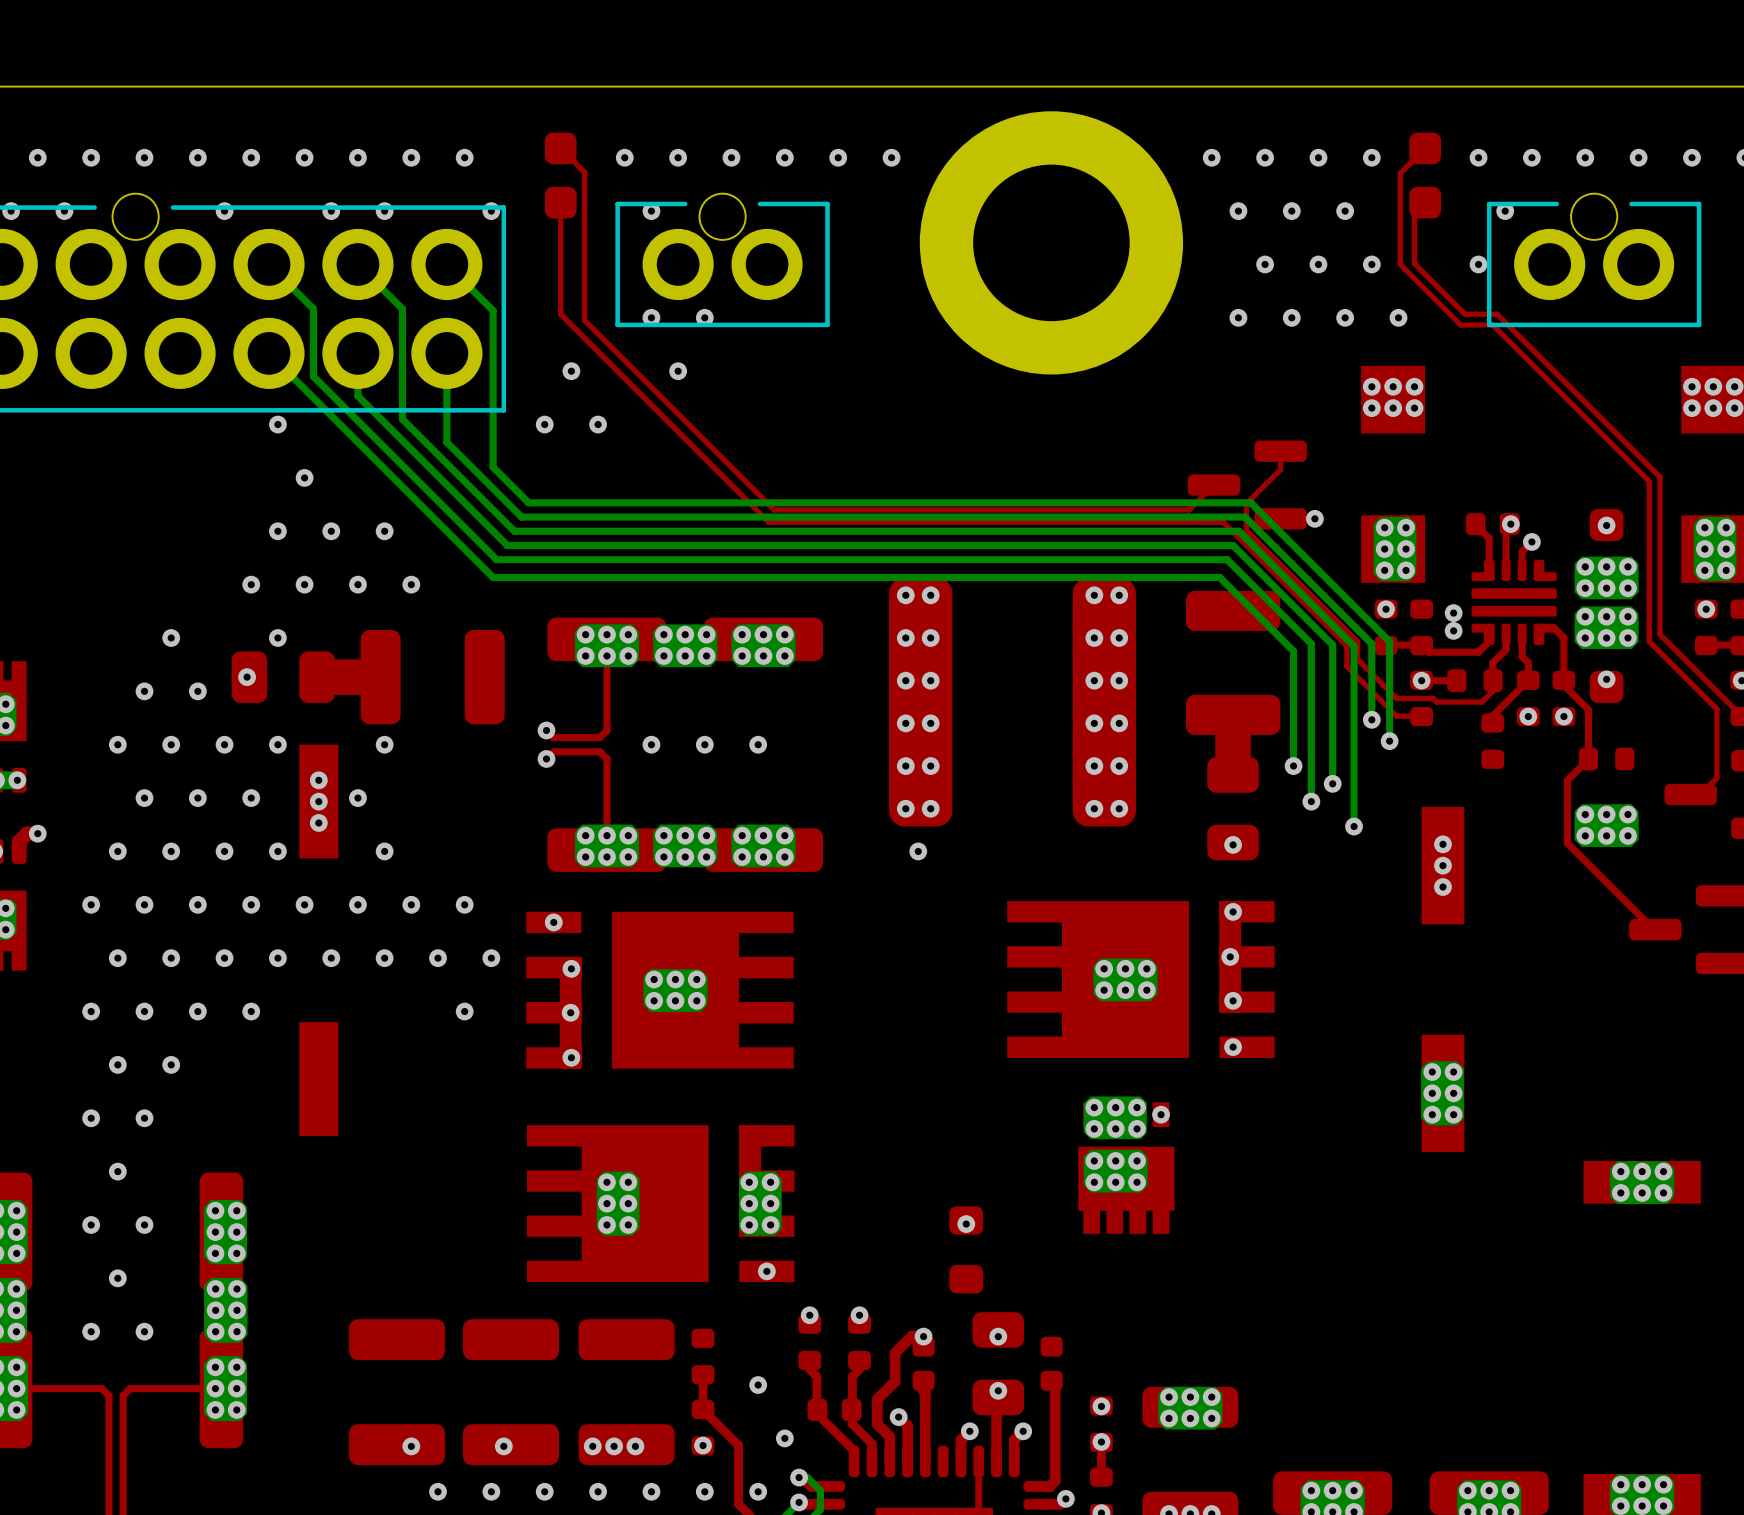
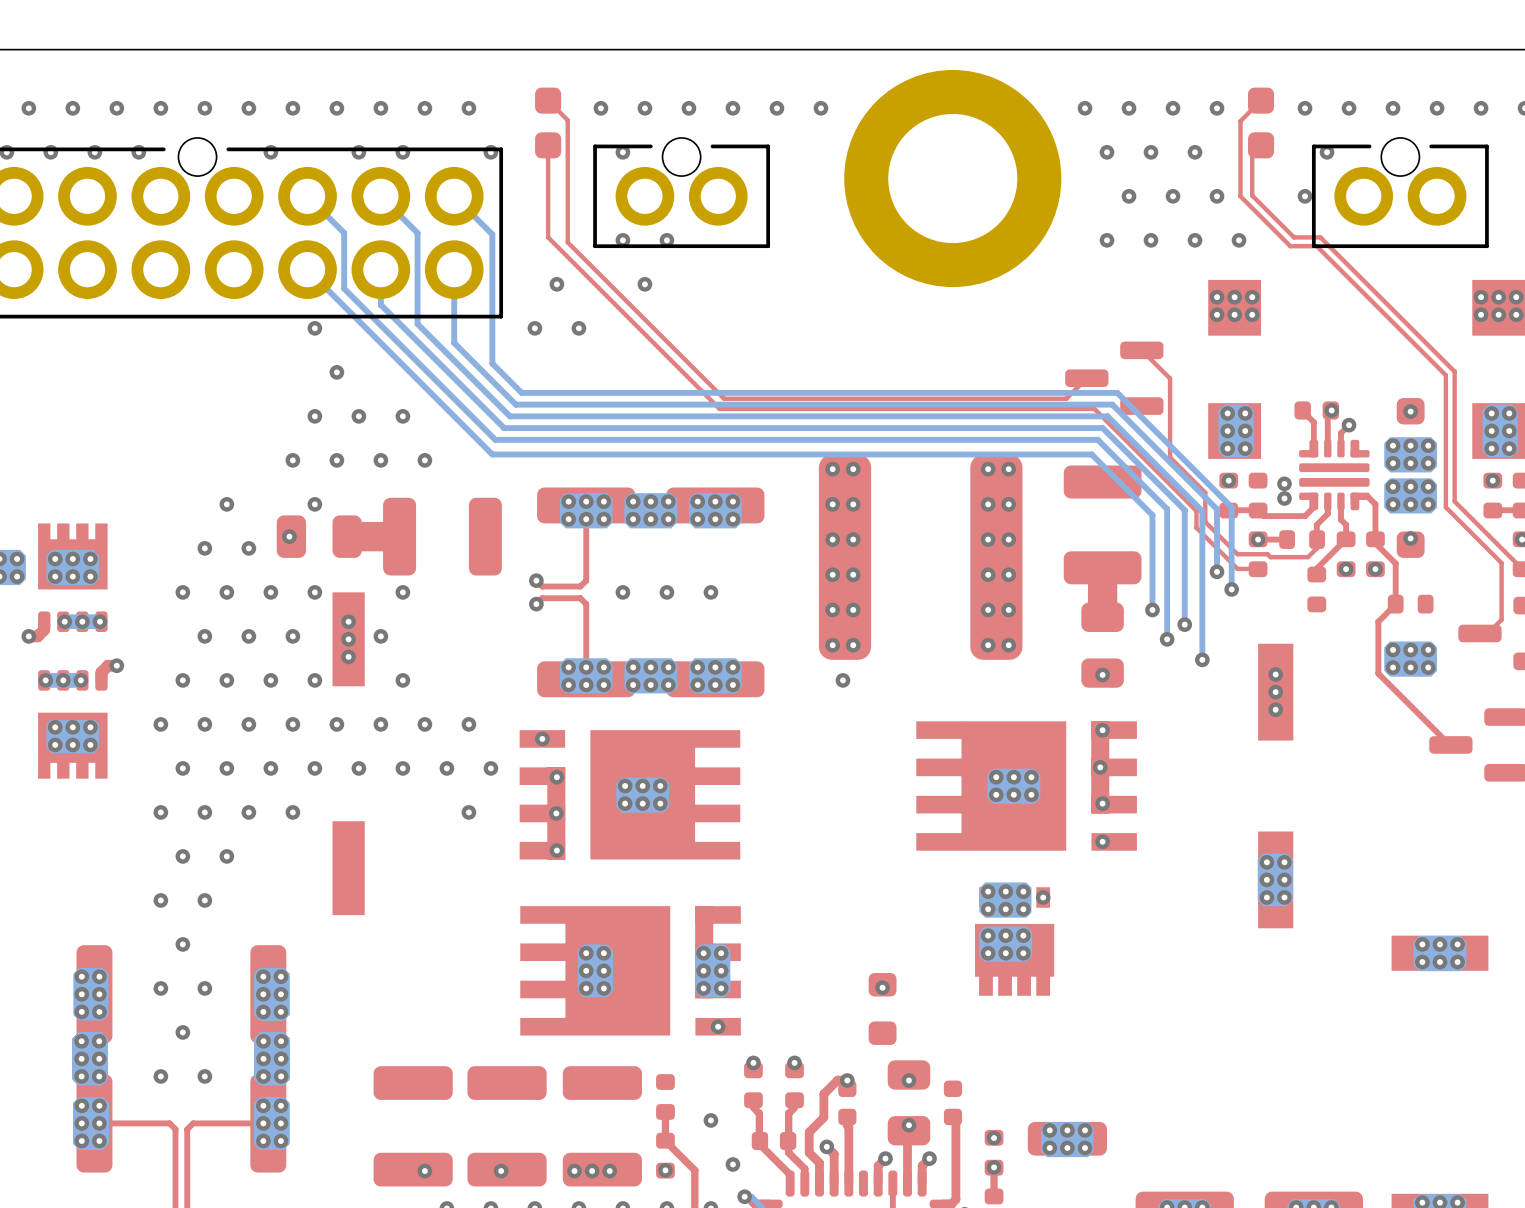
top track: (1280, 451) (1280, 469) (1246, 503) (1246, 530) (1357, 641) -> (1141, 350) (1170, 378) (1170, 457) (1205, 492) (1205, 507)
via: (1314, 518) -> none

